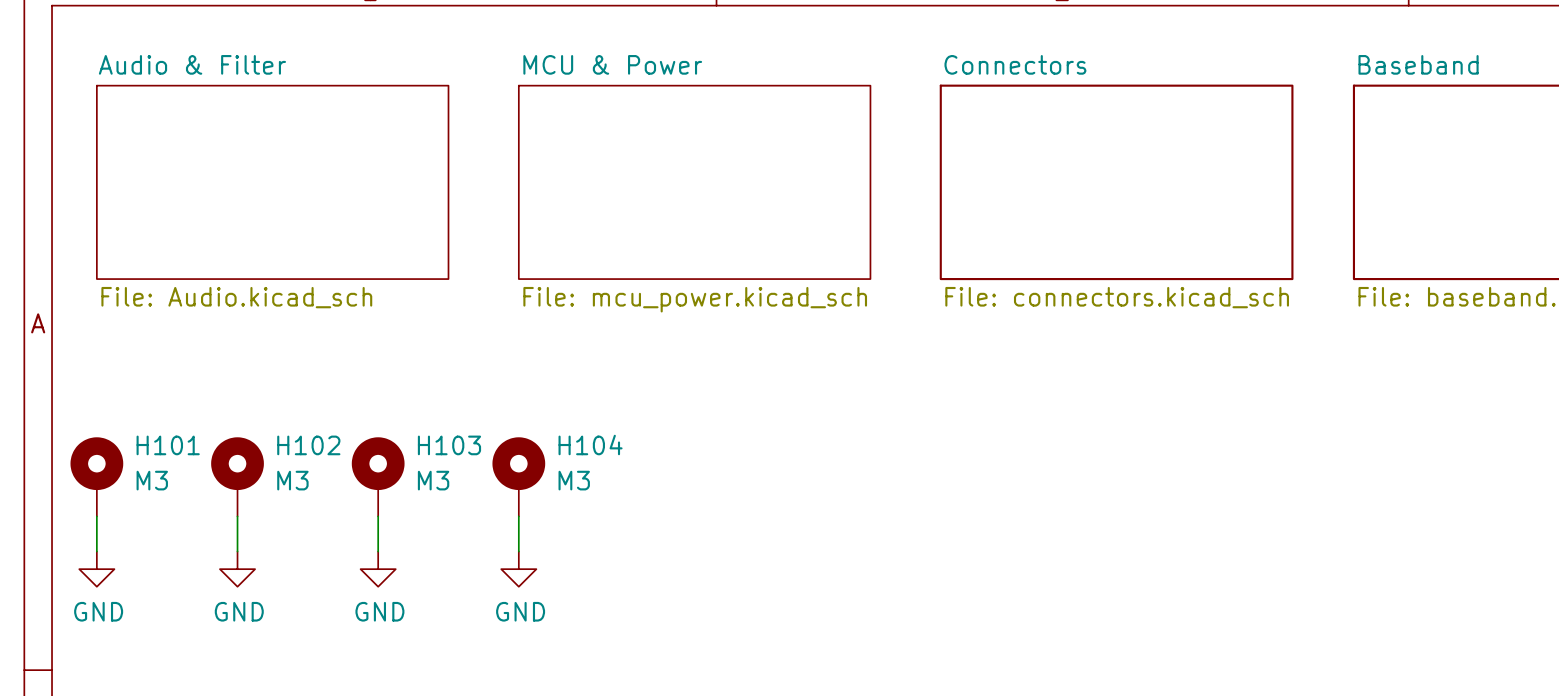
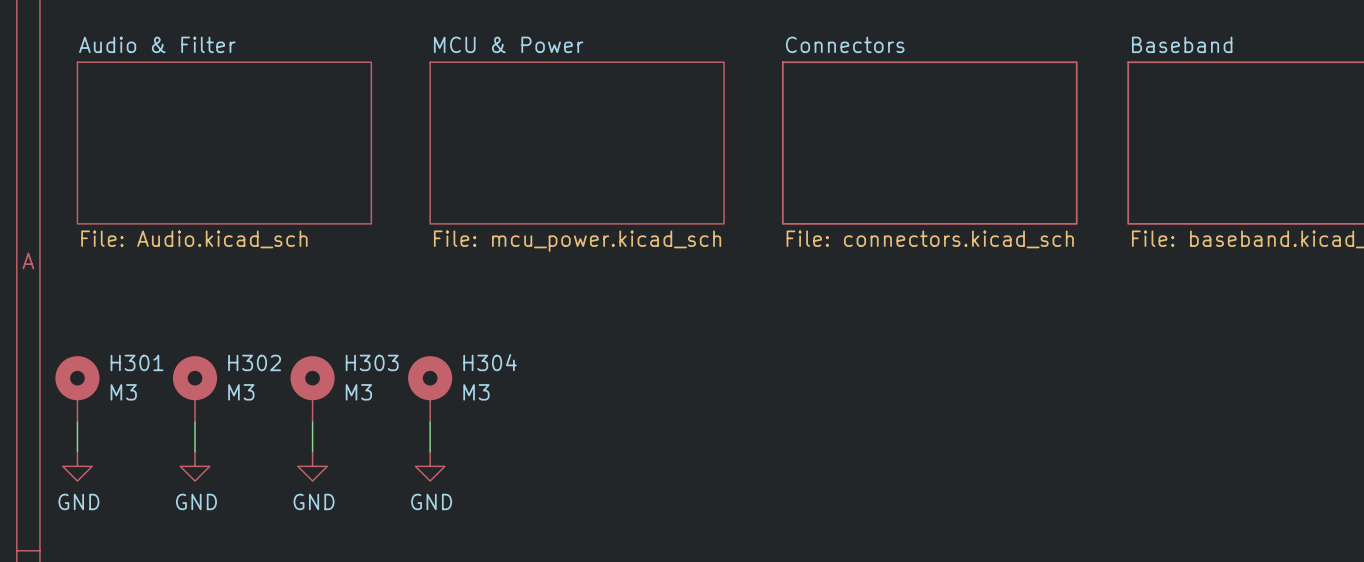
H101 name: H101 (168, 445) -> H301 (137, 362)
H102 name: H102 (308, 445) -> H302 (254, 362)
H103 name: H103 (449, 445) -> H303 (372, 362)
H104 name: H104 (590, 445) -> H304 (490, 362)

